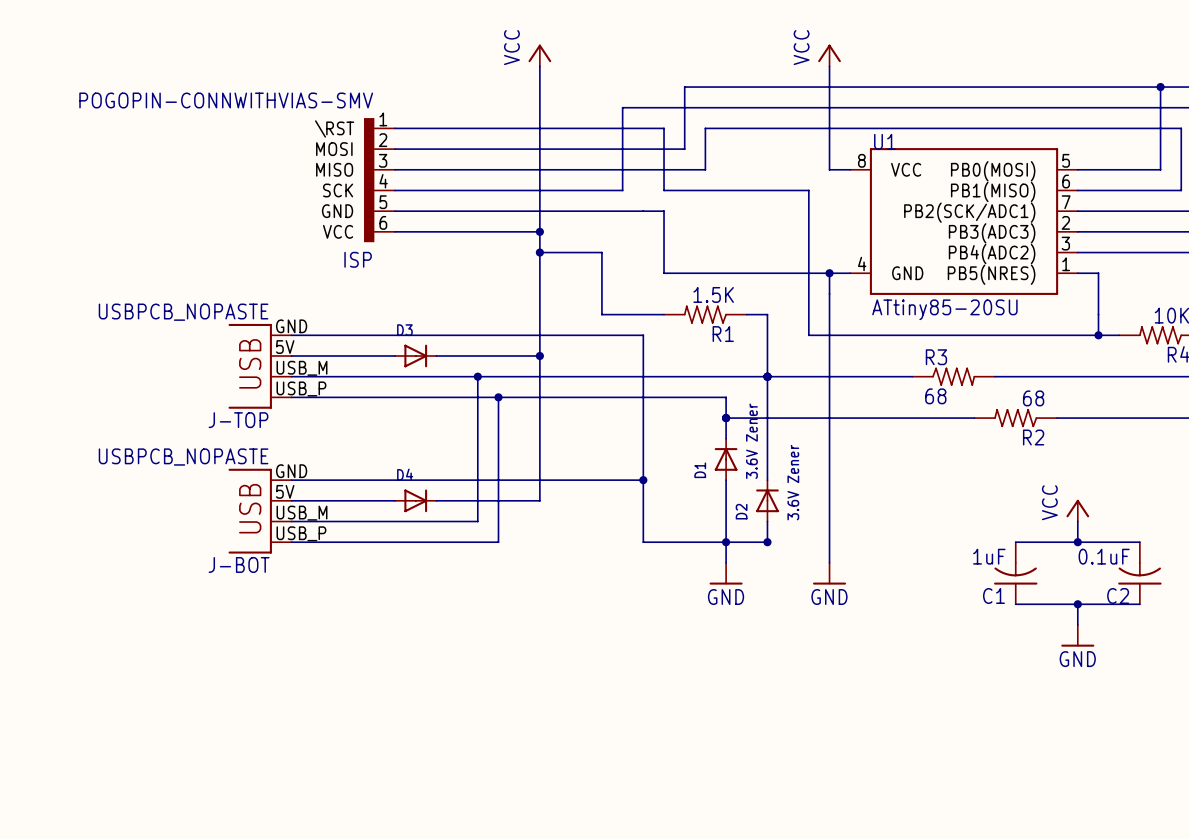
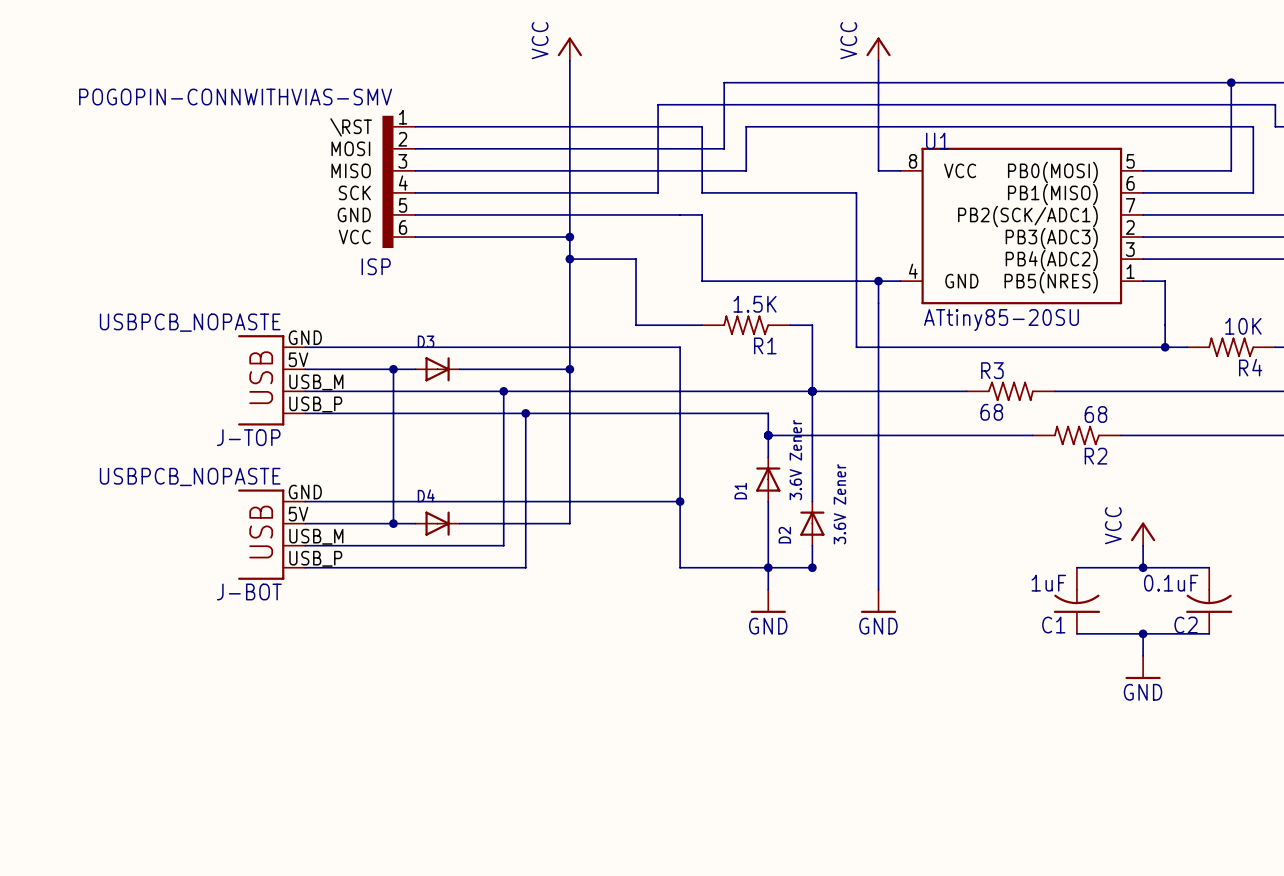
wire: none -> (393, 369) (393, 523)
junction: none -> (393, 369)
junction: none -> (393, 523)

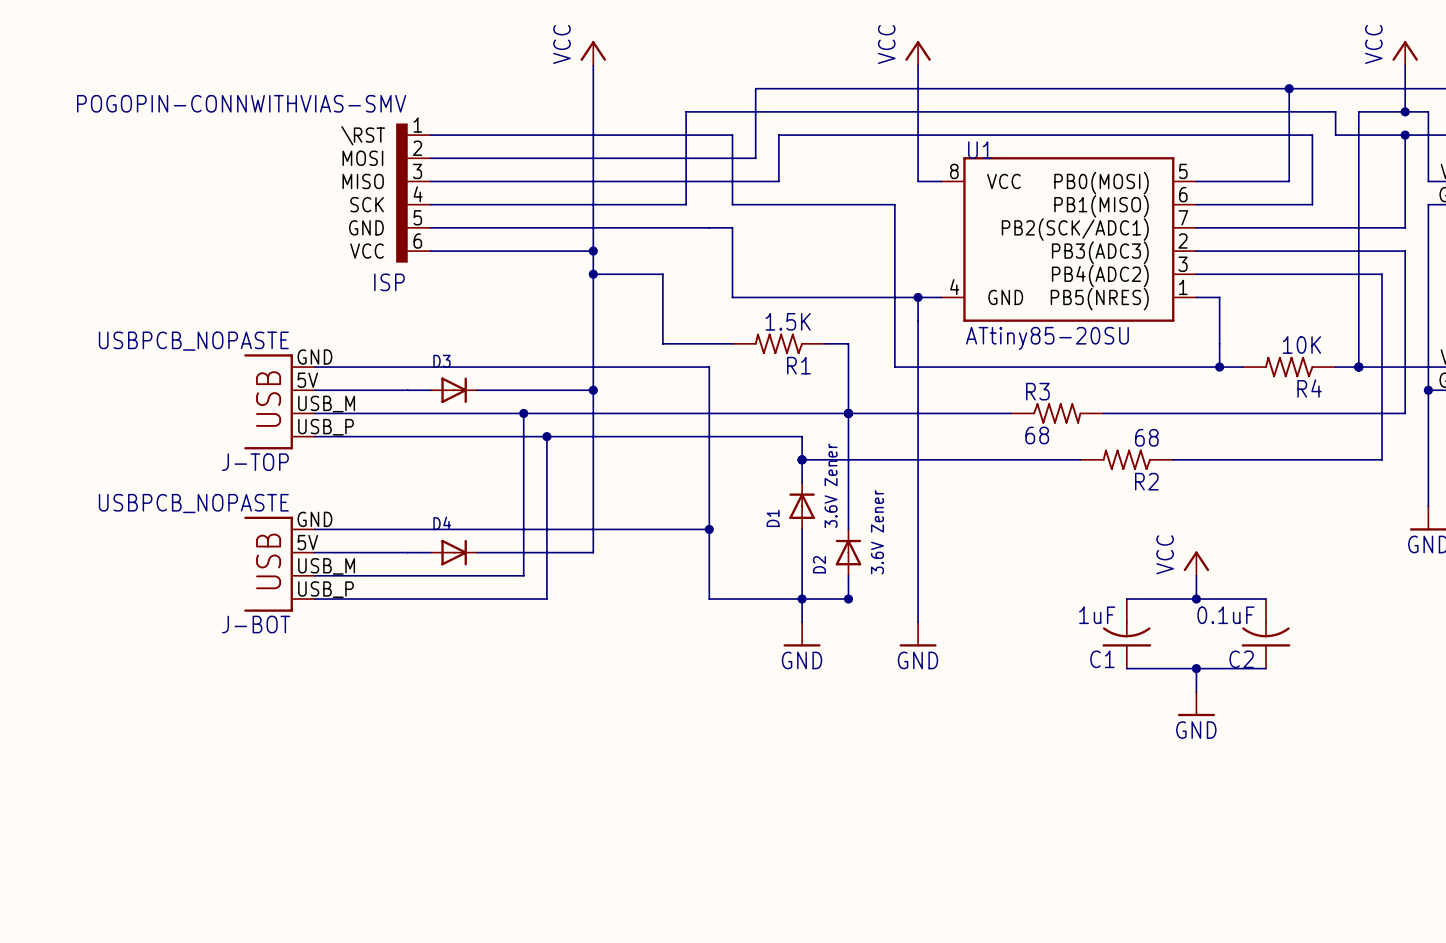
wire: (393, 369) (393, 523) -> none
junction: (393, 369) -> none
junction: (393, 523) -> none

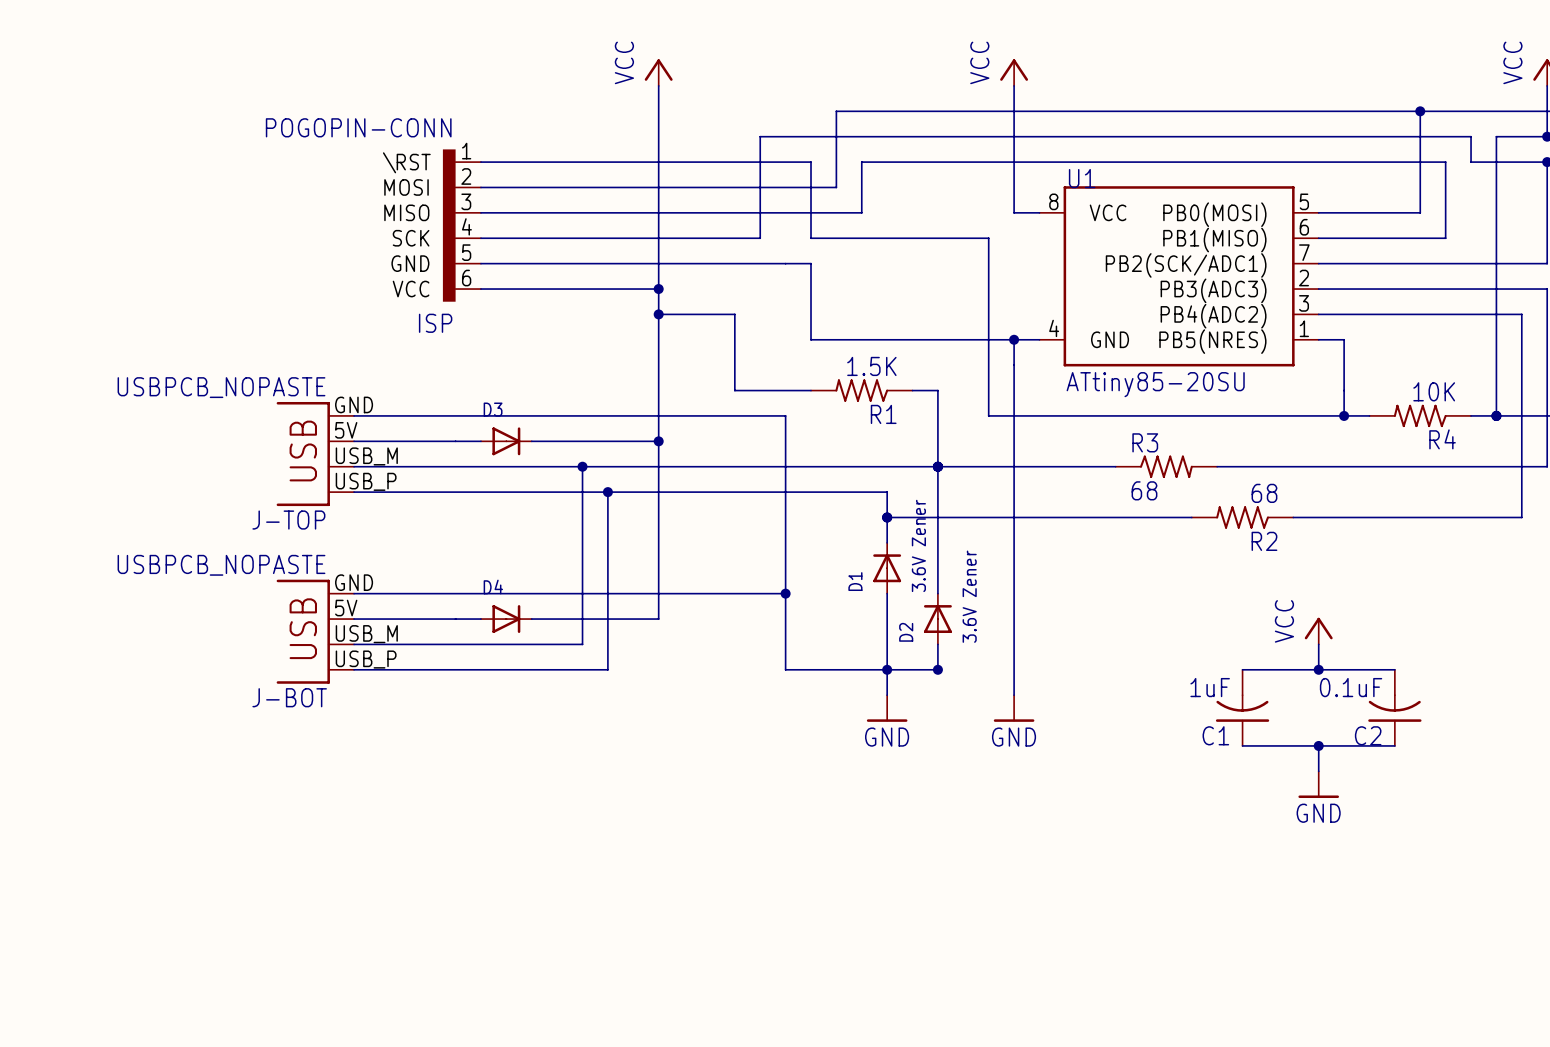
ISP value: POGOPIN-CONNWITHVIAS-SMV (241, 103) -> POGOPIN-CONN (358, 127)

